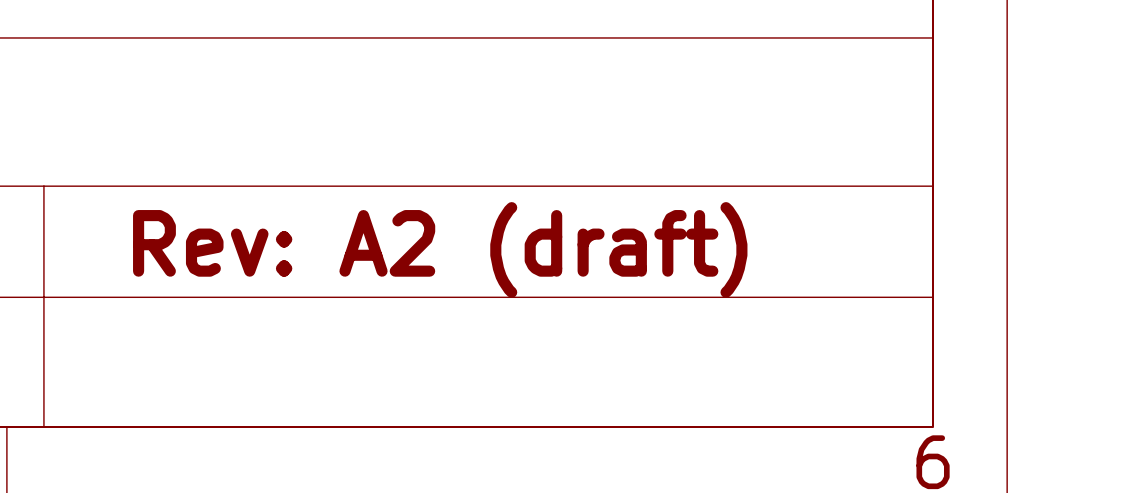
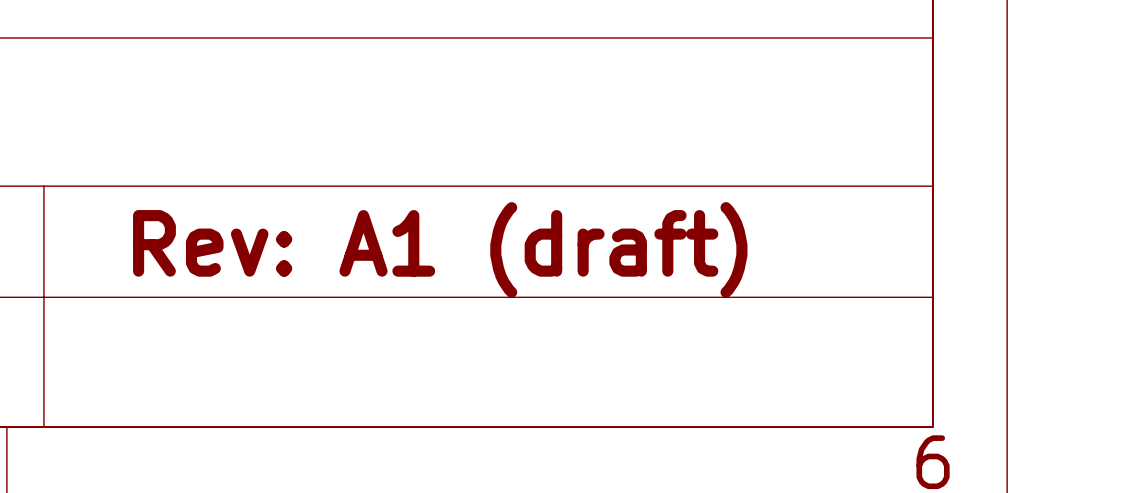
title block: Rev: A2 (draft) (440, 249) -> Rev: A1 (draft) (440, 249)

